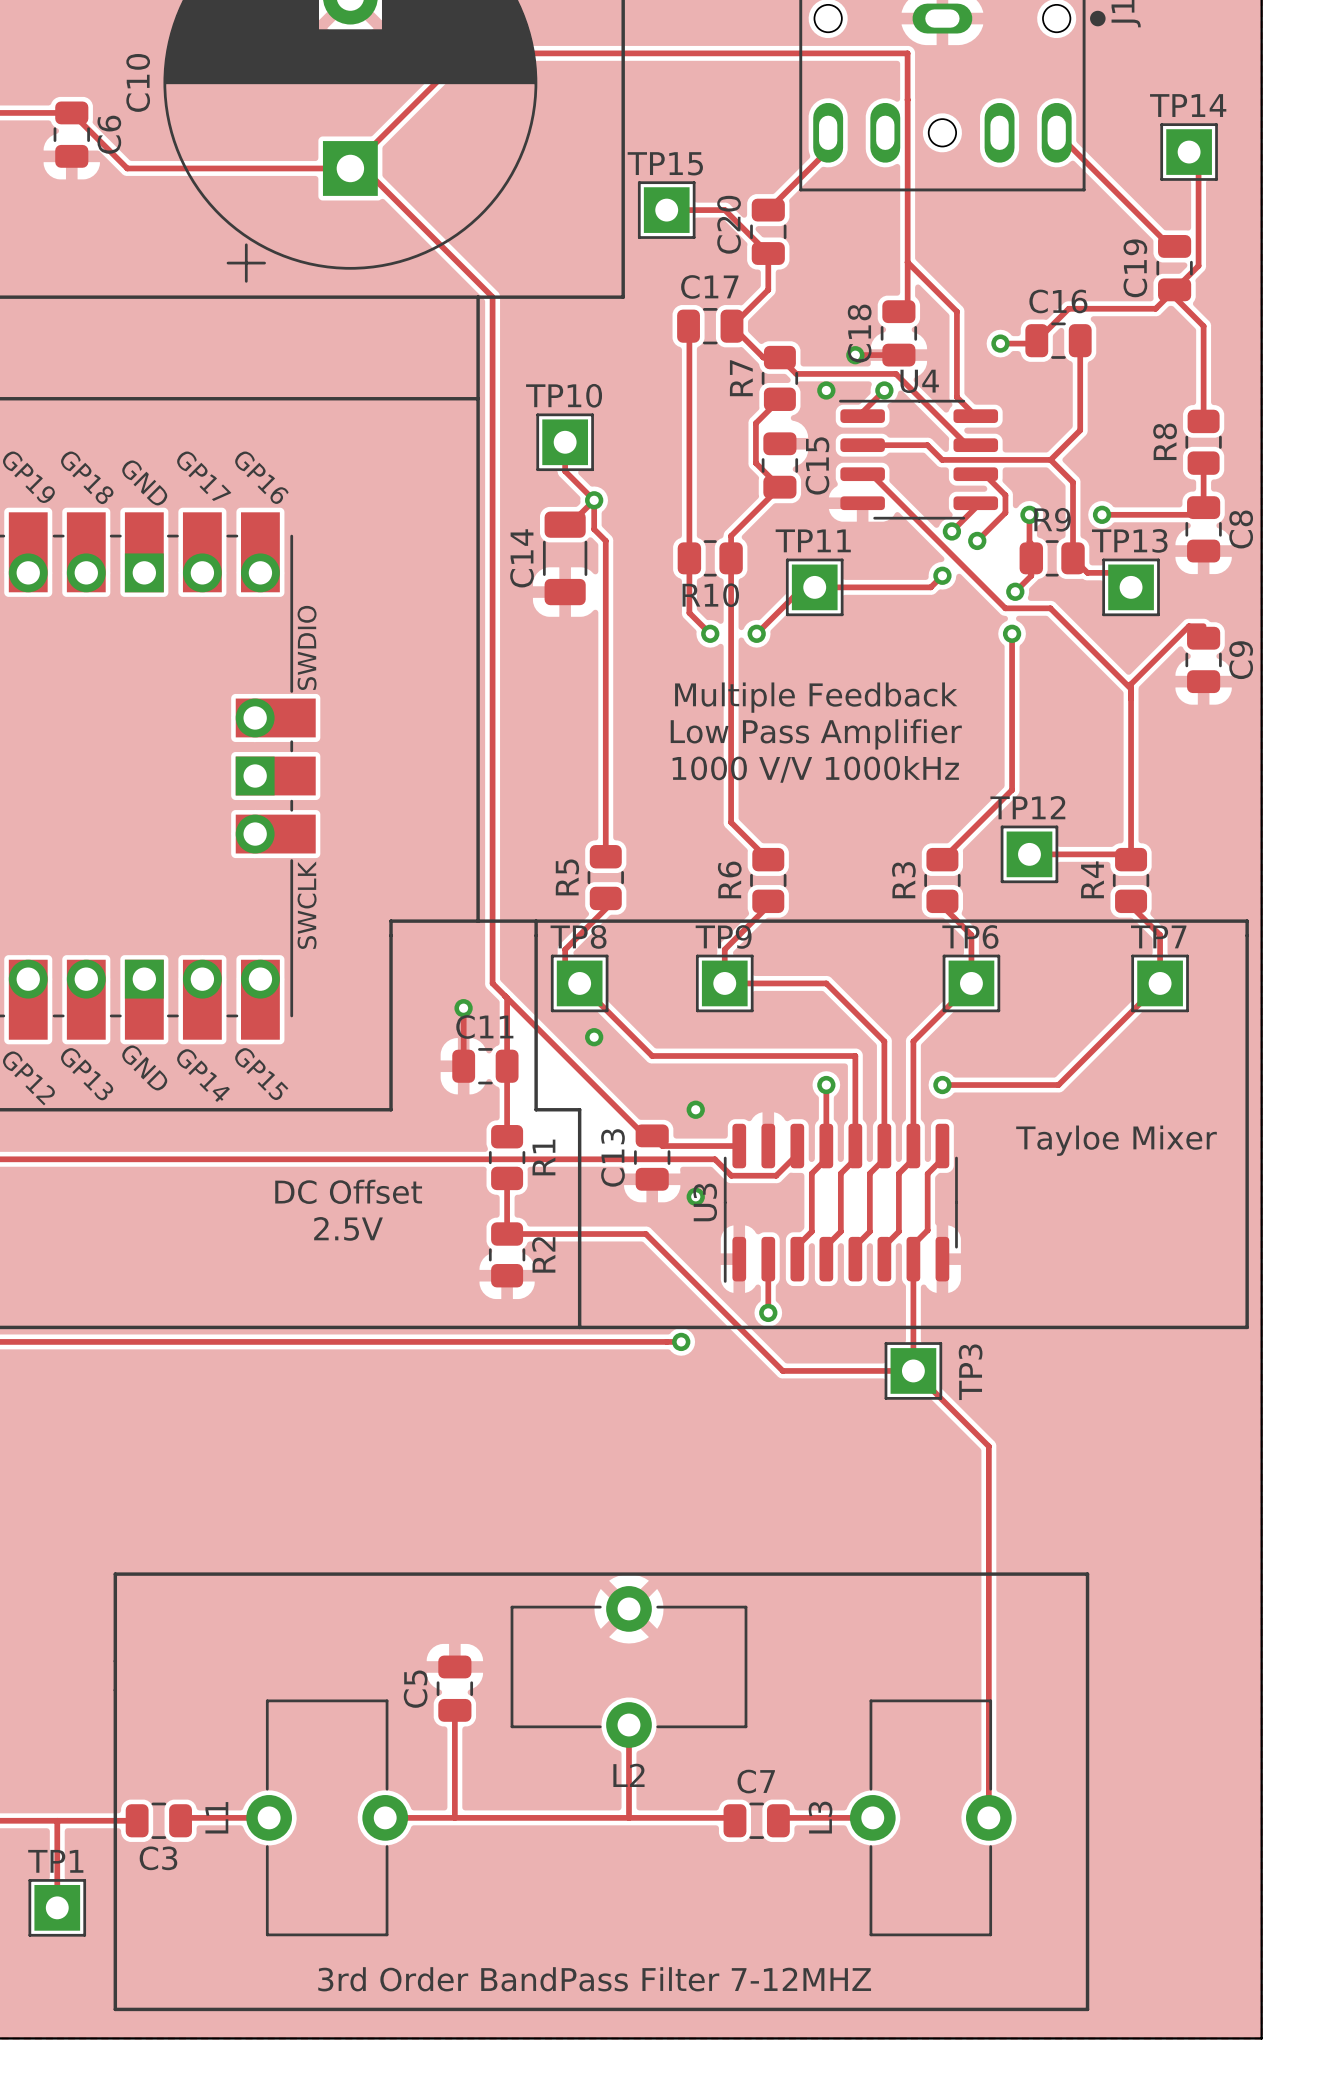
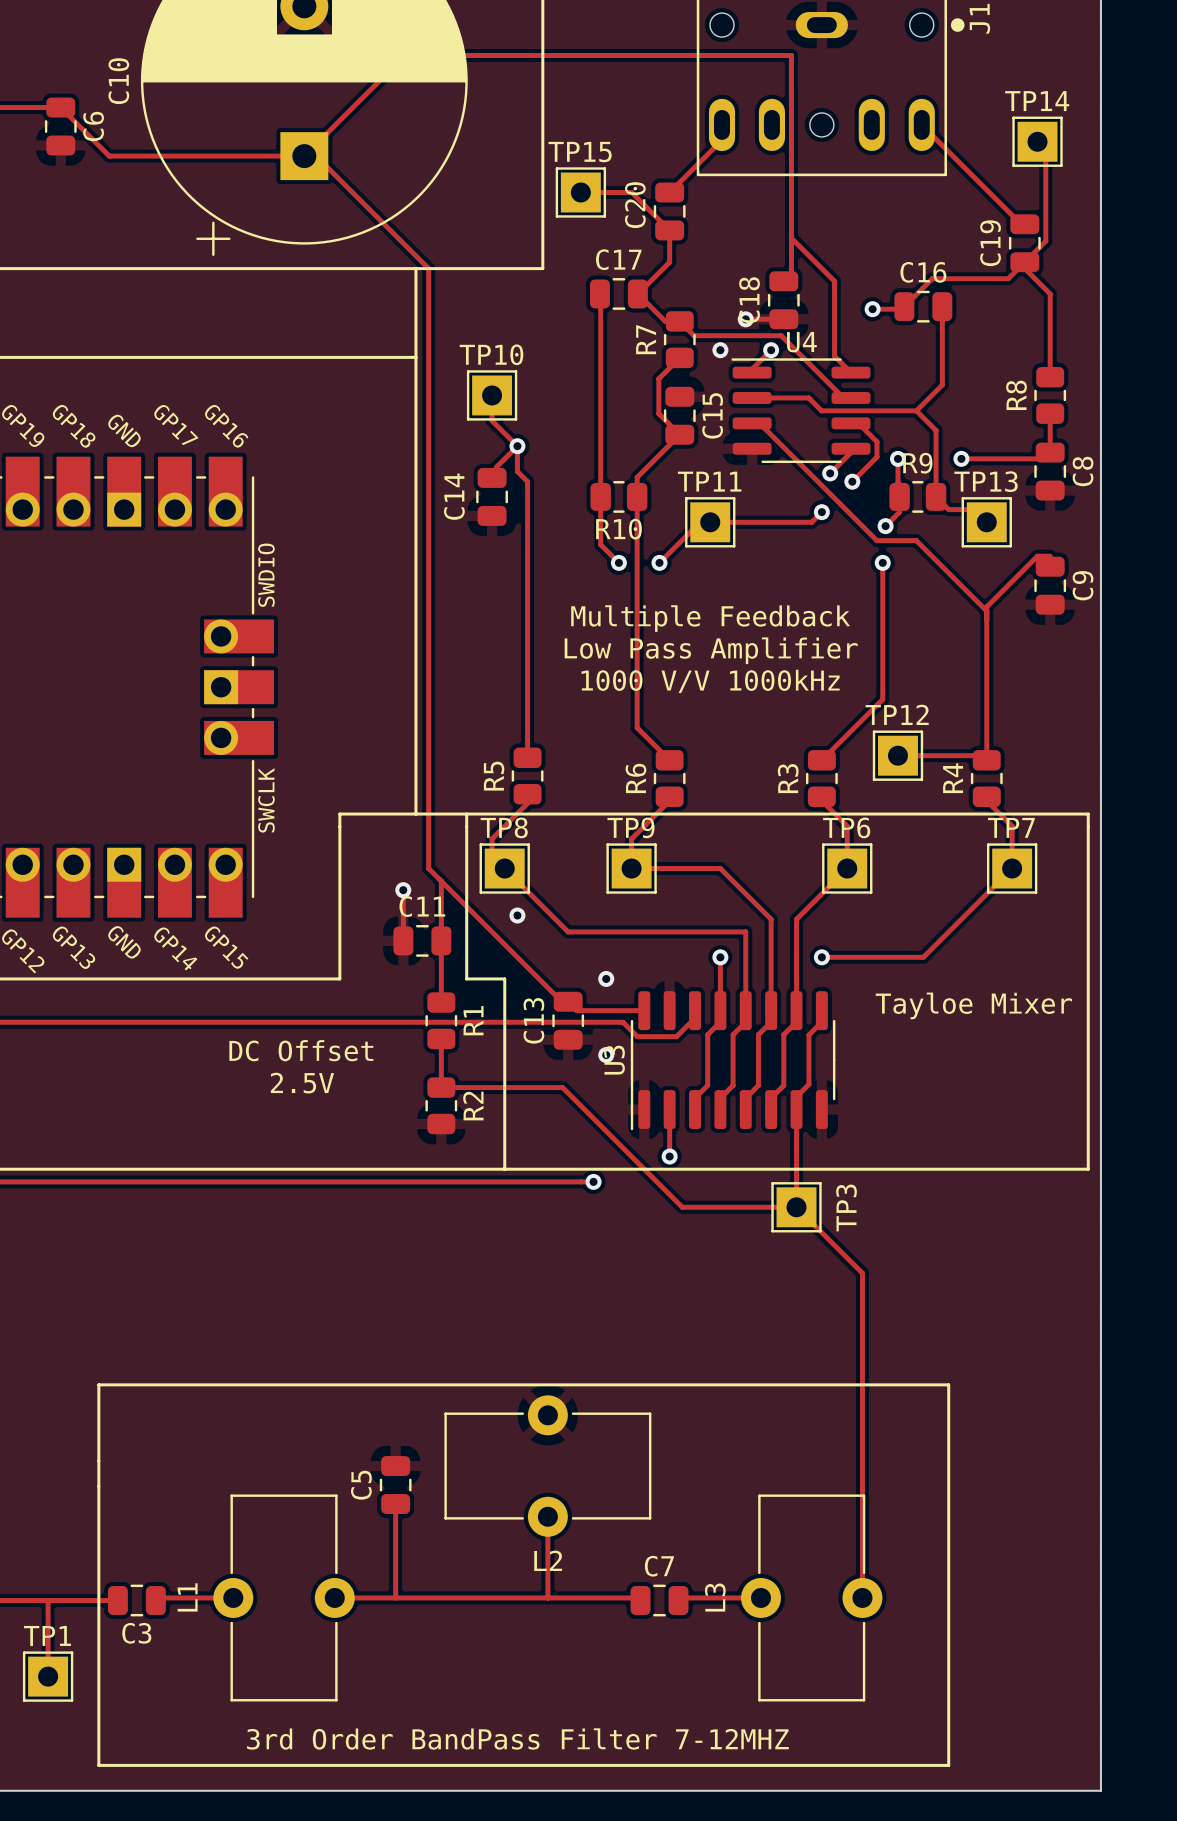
C14 footprint: [542, 511, 588, 606] -> [476, 467, 508, 526]

